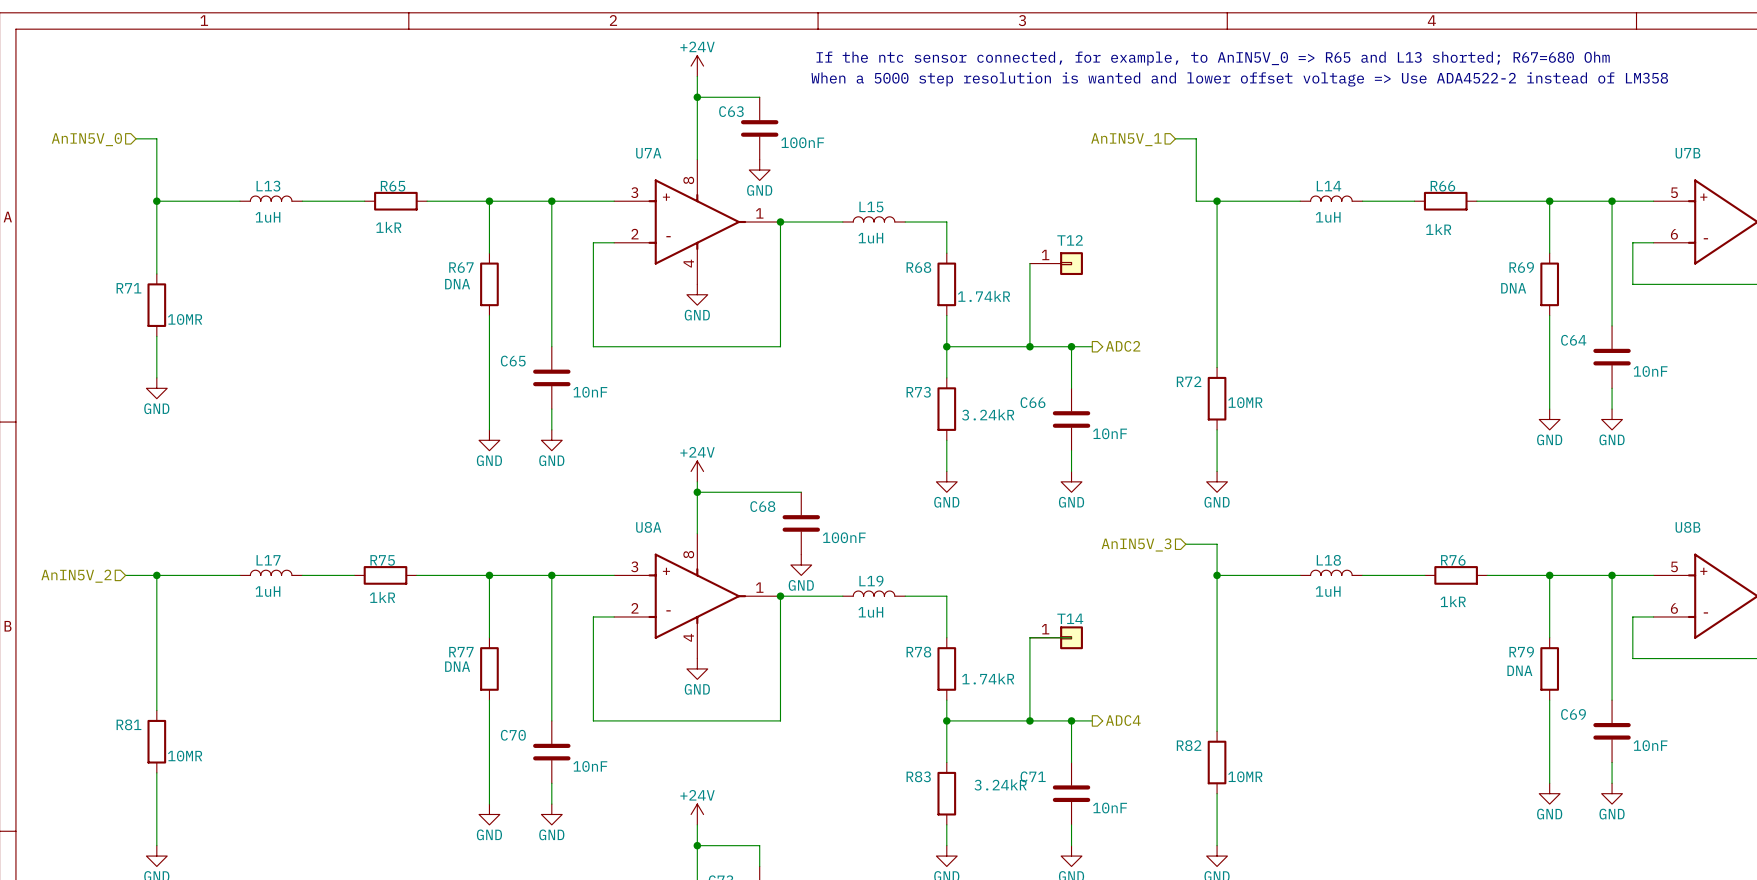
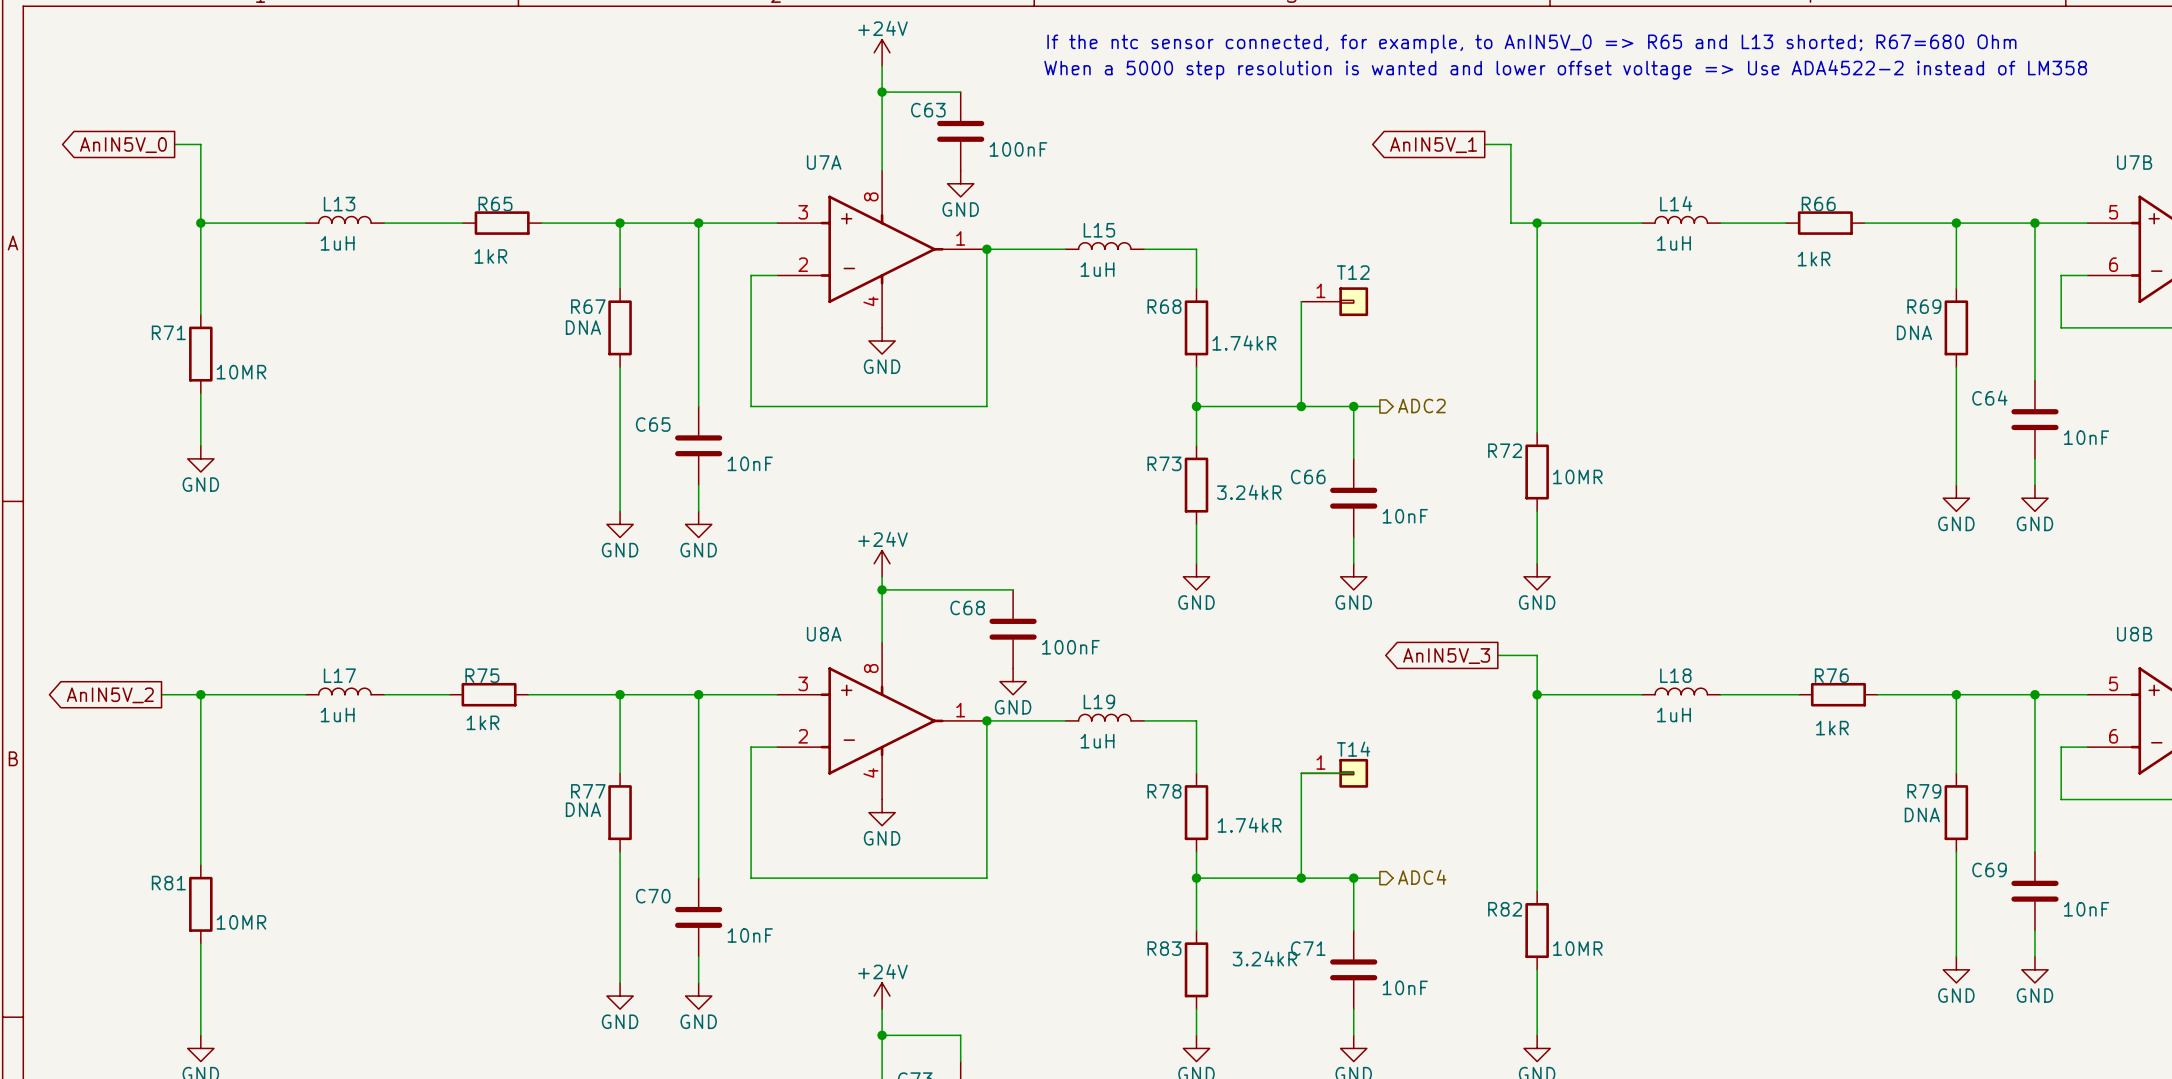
hierarchical label: AnIN5V_0 (86, 139) -> none
hierarchical label: AnIN5V_1 (1126, 139) -> none
global label: none -> AnIN5V_0 (123, 145)
global label: none -> AnIN5V_1 (1433, 145)
hierarchical label: AnIN5V_3 (1136, 545) -> none
global label: none -> AnIN5V_3 (1446, 656)
hierarchical label: AnIN5V_2 (76, 576) -> none
global label: none -> AnIN5V_2 (110, 695)

